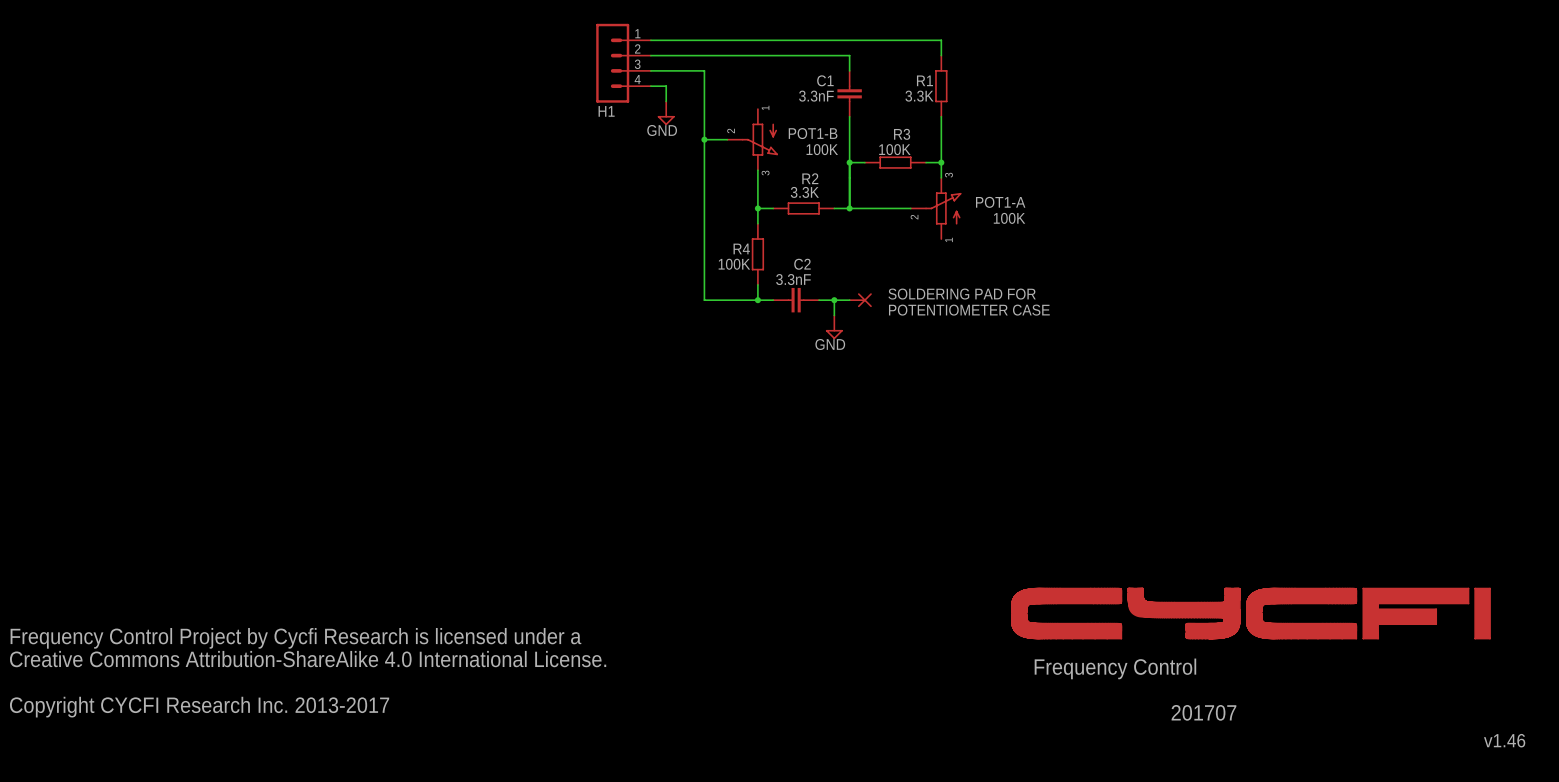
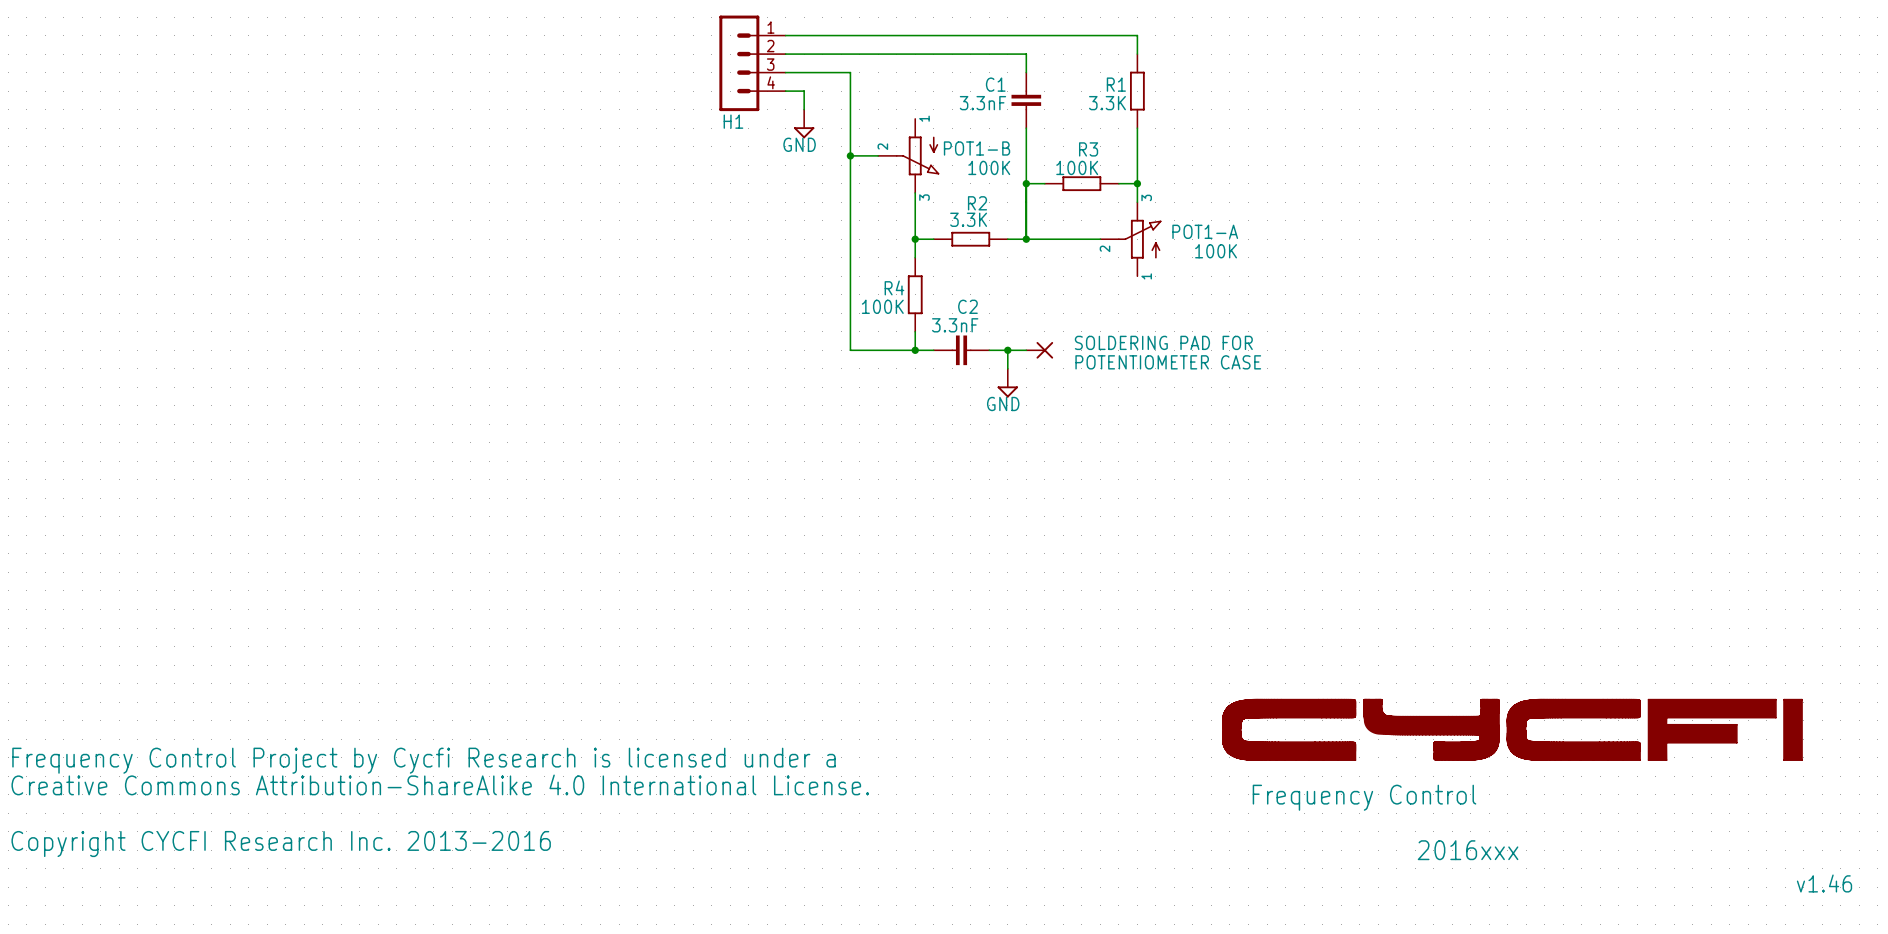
text: Copyright CYCFI Research Inc. 2013-2017 (199, 707) -> Copyright CYCFI Research Inc. 2013-2016 (281, 844)
text: 201707 (1203, 712) -> 2016xxx (1468, 850)

